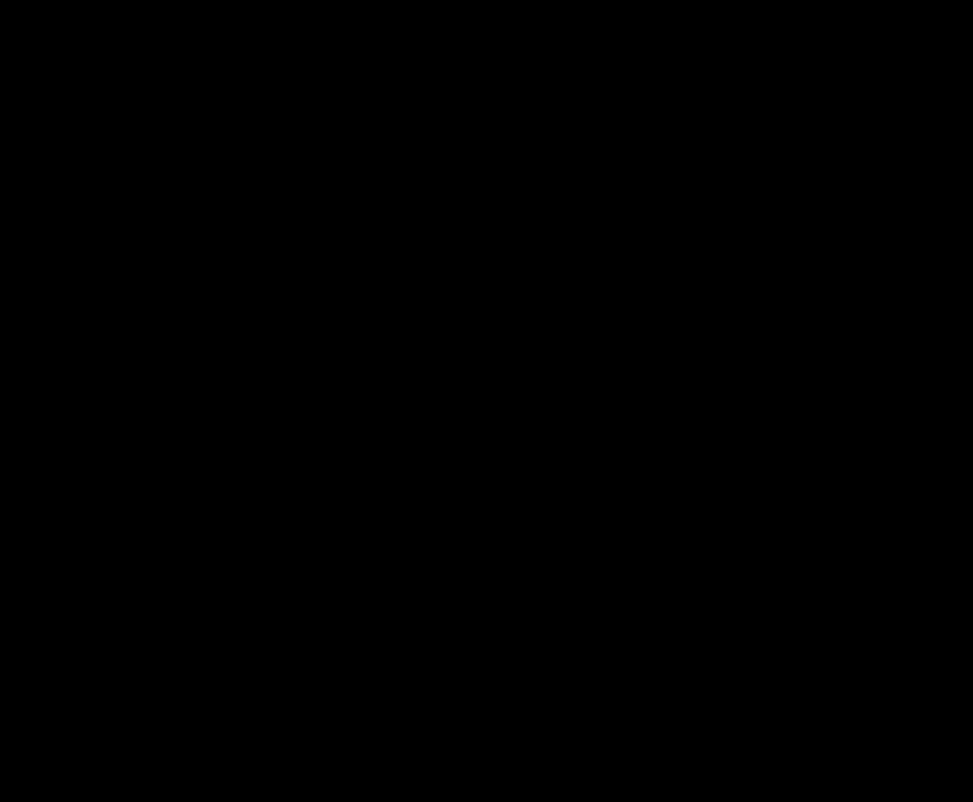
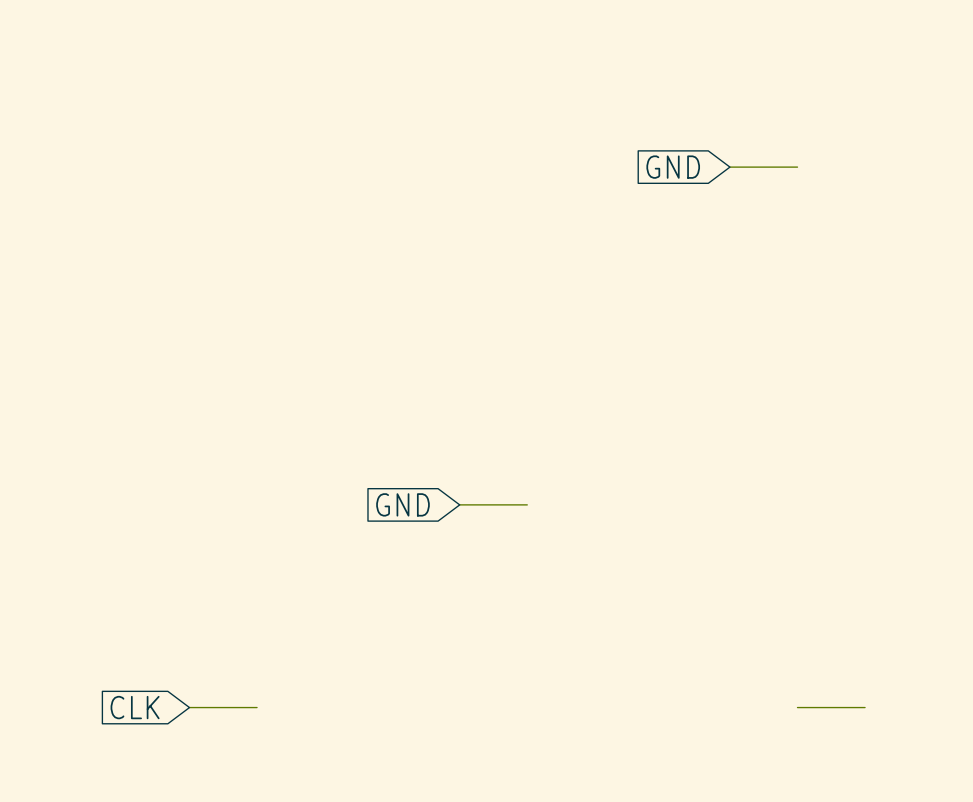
global label: none -> GND (673, 167)
wire: none -> (729, 167) (797, 167)
global label: none -> GND (402, 504)
wire: none -> (459, 504) (527, 504)
global label: none -> CLK (135, 707)
wire: none -> (189, 707) (257, 707)
wire: none -> (797, 707) (865, 707)

